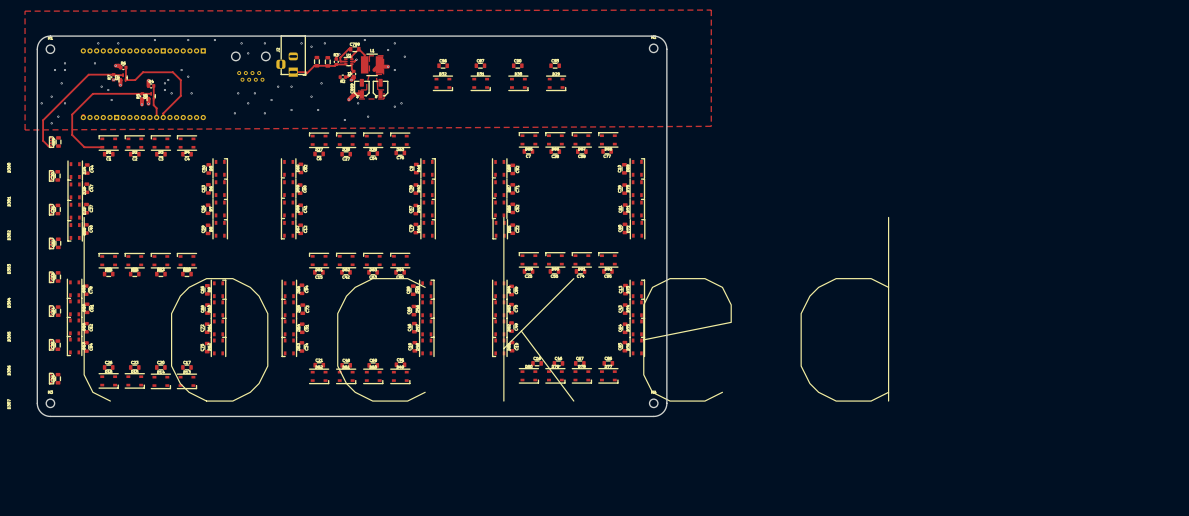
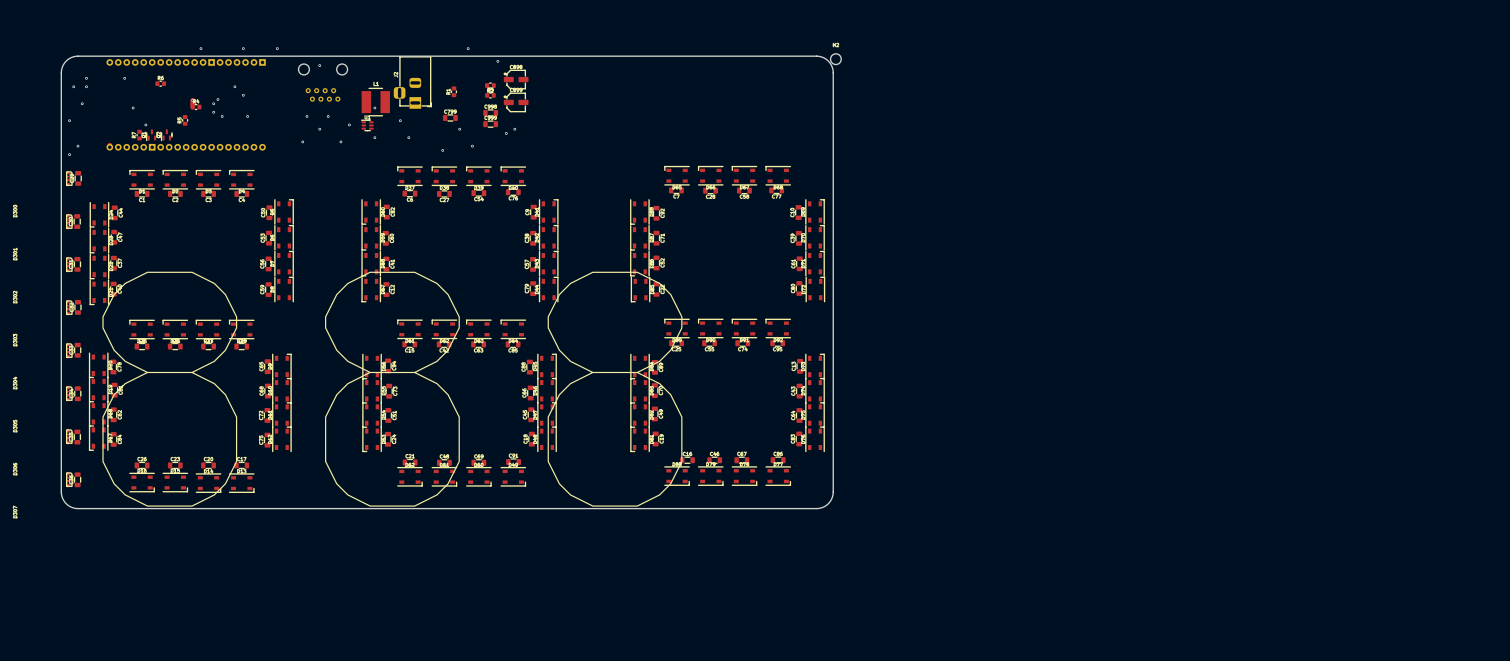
zone outline: (711, 10) (25, 11) (25, 129) (711, 126) (711, 10) -> none
board edge: (50, 36) (653, 36) (660, 38) (664, 42) (666, 49) (666, 403) (664, 410) (660, 414) (653, 416) (50, 416) (43, 414) (39, 410) (37, 403) (37, 49) (41, 39) (50, 36) -> (78, 56) (66, 61) (61, 72) (61, 491) (62, 499) (69, 506) (78, 508) (816, 508) (823, 506) (830, 500) (833, 491) (833, 72) (831, 65) (825, 58) (816, 56) (78, 56)
via: (98, 43) -> none
via: (118, 43) -> none
via: (241, 43) -> none
via: (264, 43) -> none
via: (301, 43) -> none
via: (324, 43) -> none
via: (394, 43) -> none
via: (311, 46) -> none
part: (50, 49) -> none
track: (350, 49) (340, 57) (340, 61) (345, 61) -> none
part position: (354, 49) -> (450, 117)
track: (339, 54) (336, 59) -> none
via: (339, 54) -> none
zone outline: (383, 55) (369, 55) (366, 89) (358, 89) (358, 98) (384, 99) (384, 89) (377, 89) (375, 74) (383, 74) (383, 55) -> none
part position: (291, 56) -> (412, 82)
via: (404, 56) -> none
track: (351, 59) (351, 56) (358, 49) (364, 55) (364, 64) -> none
track: (356, 59) (351, 61) -> none
via: (356, 59) -> none
part: (316, 61) -> none
part: (327, 61) -> none
part rotation: 0° (336, 61) -> 90° clockwise (490, 95)
part position: (336, 61) -> (490, 95)
part position: (348, 61) -> (367, 125)
track: (345, 64) (314, 65) (306, 73) (293, 72) -> none
track: (351, 64) (353, 71) (345, 77) -> none
part position: (372, 64) -> (375, 102)
part: none -> (516, 79)
track: (115, 65) (120, 67) -> none
via: (115, 65) -> none
part: (443, 65) -> none
part: (480, 65) -> none
part: (517, 65) -> none
part: (555, 65) -> none
track: (388, 66) (379, 64) (374, 70) -> none
via: (388, 66) -> none
track: (125, 67) (125, 80) (135, 80) (143, 72) (172, 72) (180, 80) (180, 95) (163, 113) (163, 117) -> none
via: (394, 70) -> none
track: (123, 75) (88, 74) (43, 120) (43, 140) (50, 146) -> none
track: (353, 76) (351, 80) -> none
part position: (113, 77) -> (139, 135)
part position: (123, 77) -> (166, 135)
part position: (342, 77) -> (490, 85)
via: (113, 79) -> none
track: (120, 80) (120, 85) -> none
via: (351, 80) -> none
via: (321, 83) -> none
part: (442, 83) -> none
part: (480, 83) -> none
part: (518, 83) -> none
part: (556, 83) -> none
via: (120, 85) -> none
track: (153, 85) (153, 105) (156, 108) (156, 117) -> none
via: (278, 86) -> none
part rotation: 0° (361, 88) -> 90° clockwise (516, 102)
part position: (361, 88) -> (516, 102)
part: (380, 88) -> none
via: (108, 90) -> none
part: none -> (490, 112)
track: (151, 93) (92, 93) (72, 114) (72, 134) (84, 147) (102, 147) -> none
track: (361, 94) (354, 94) (348, 99) -> none
part position: (151, 96) -> (151, 135)
track: (148, 98) (148, 103) -> none
track: (142, 99) (141, 104) -> none
via: (348, 99) -> none
part: none -> (490, 124)
via: (41, 103) -> none
via: (65, 103) -> none
via: (148, 103) -> none
via: (141, 104) -> none
text: none -> 888 (392, 389)
text: locked (486, 309) -> none
part: (50, 403) -> none
part: (653, 403) -> none

